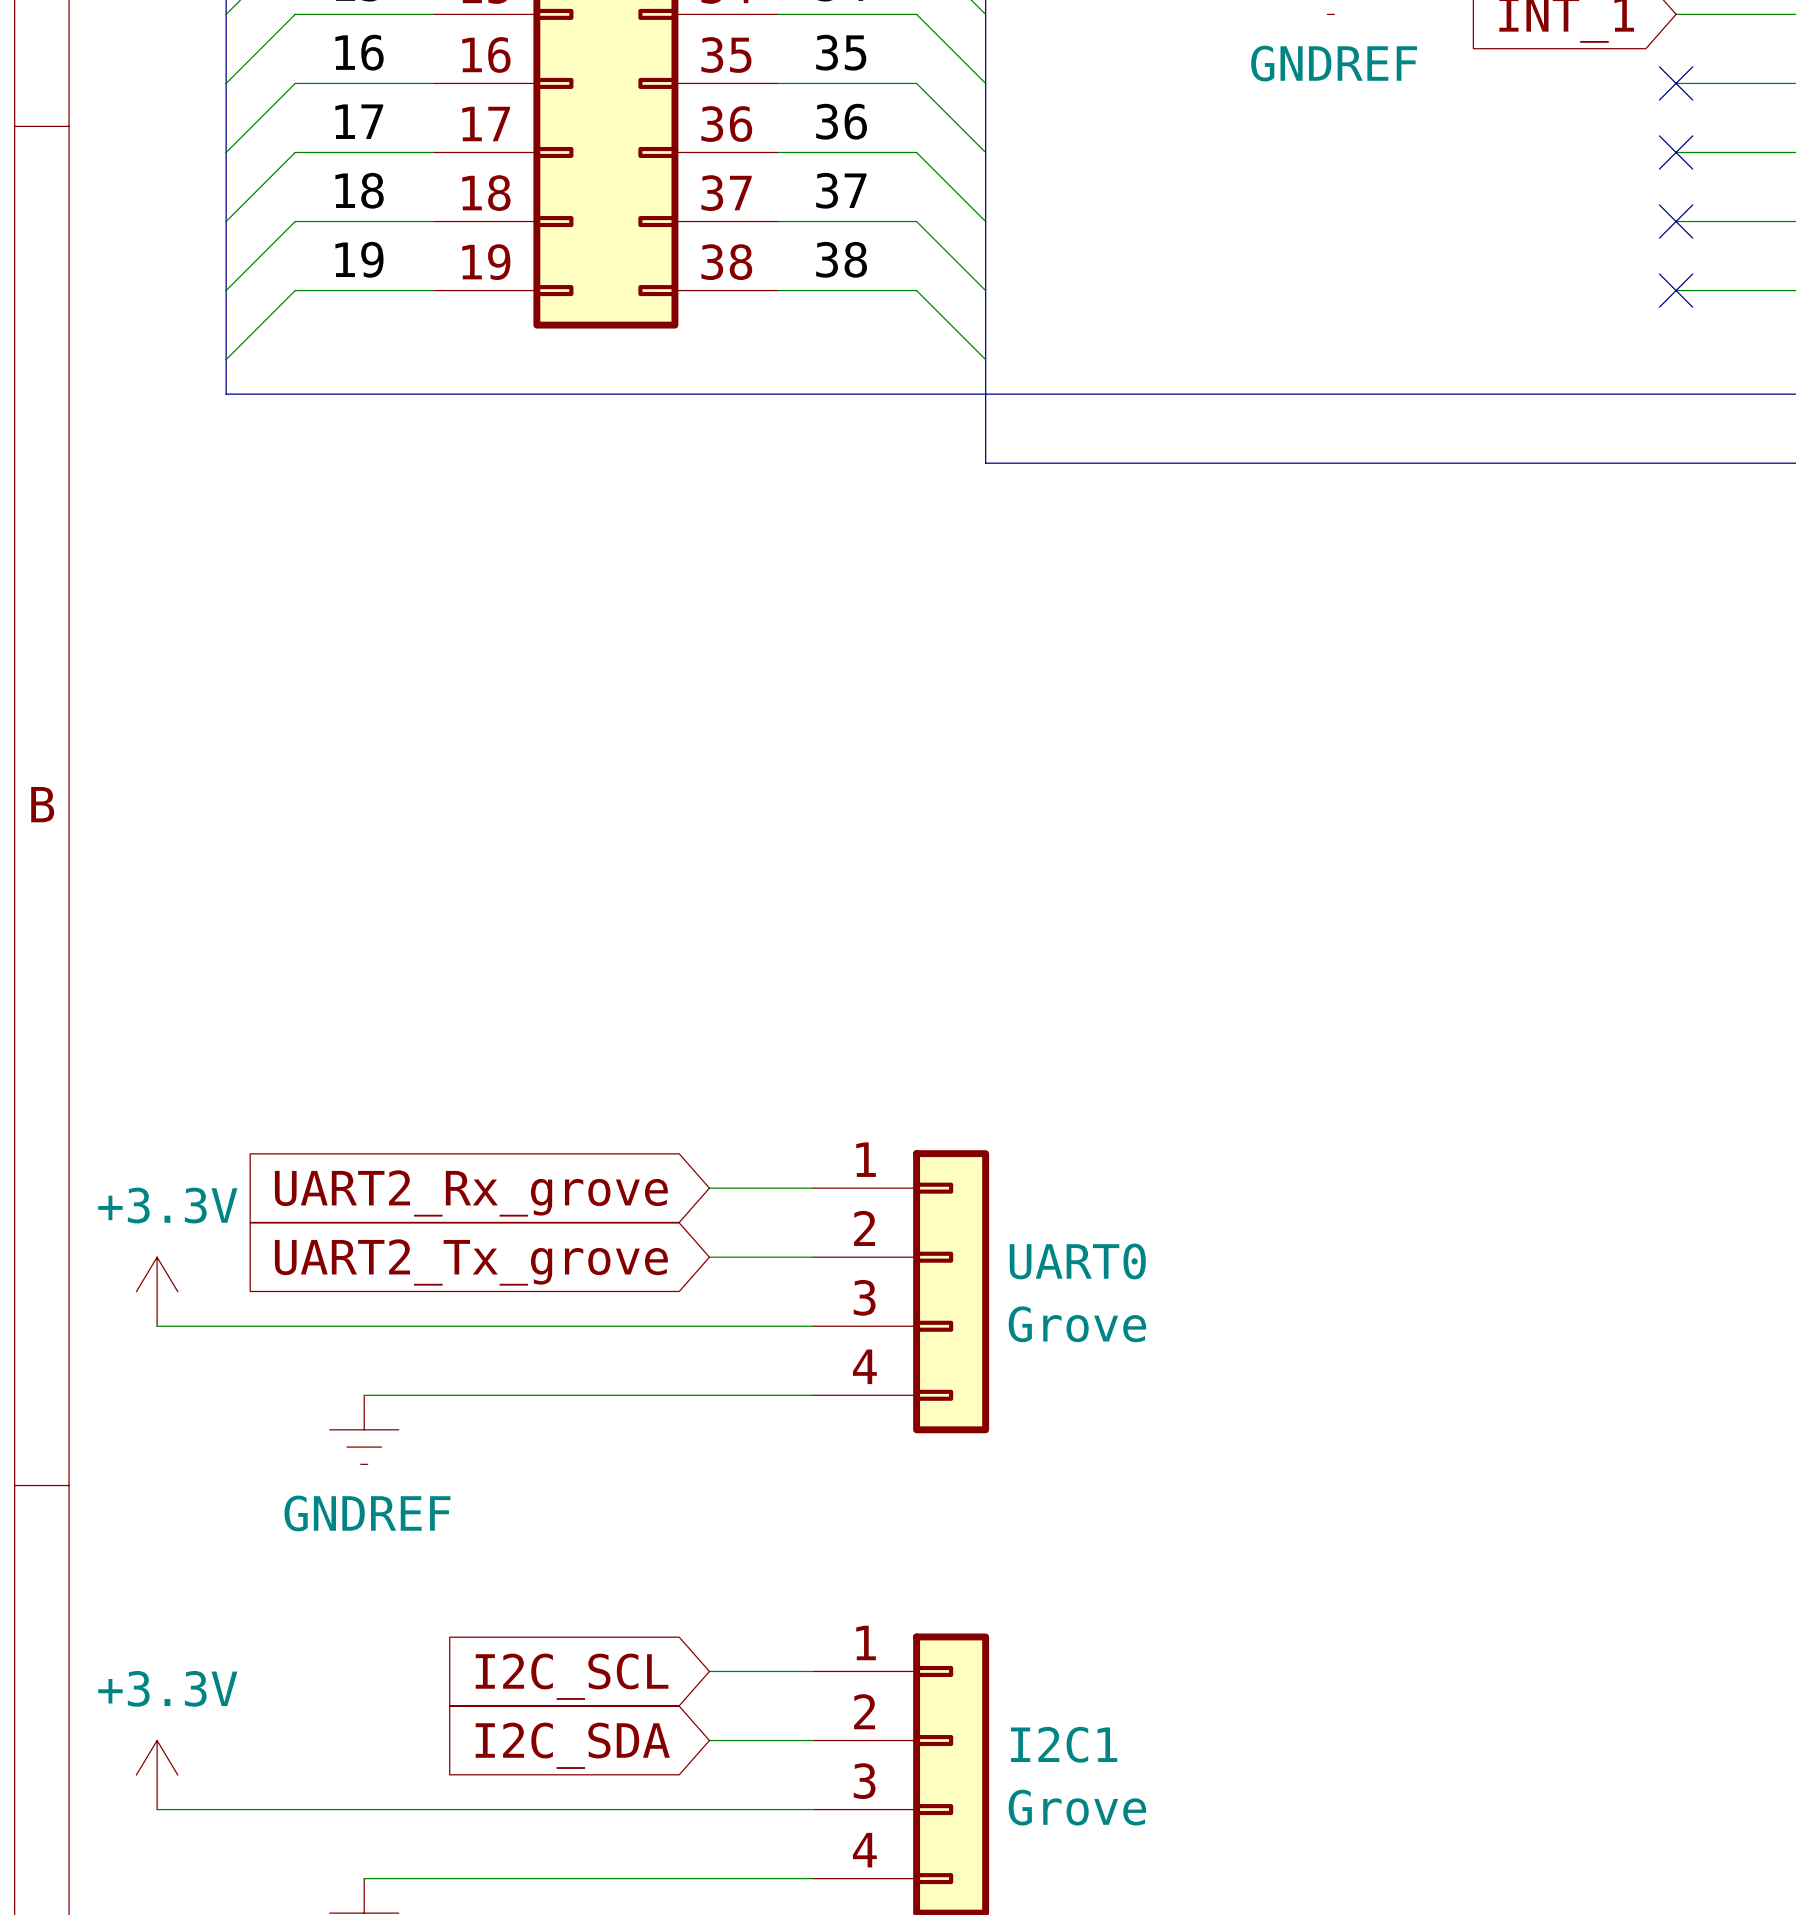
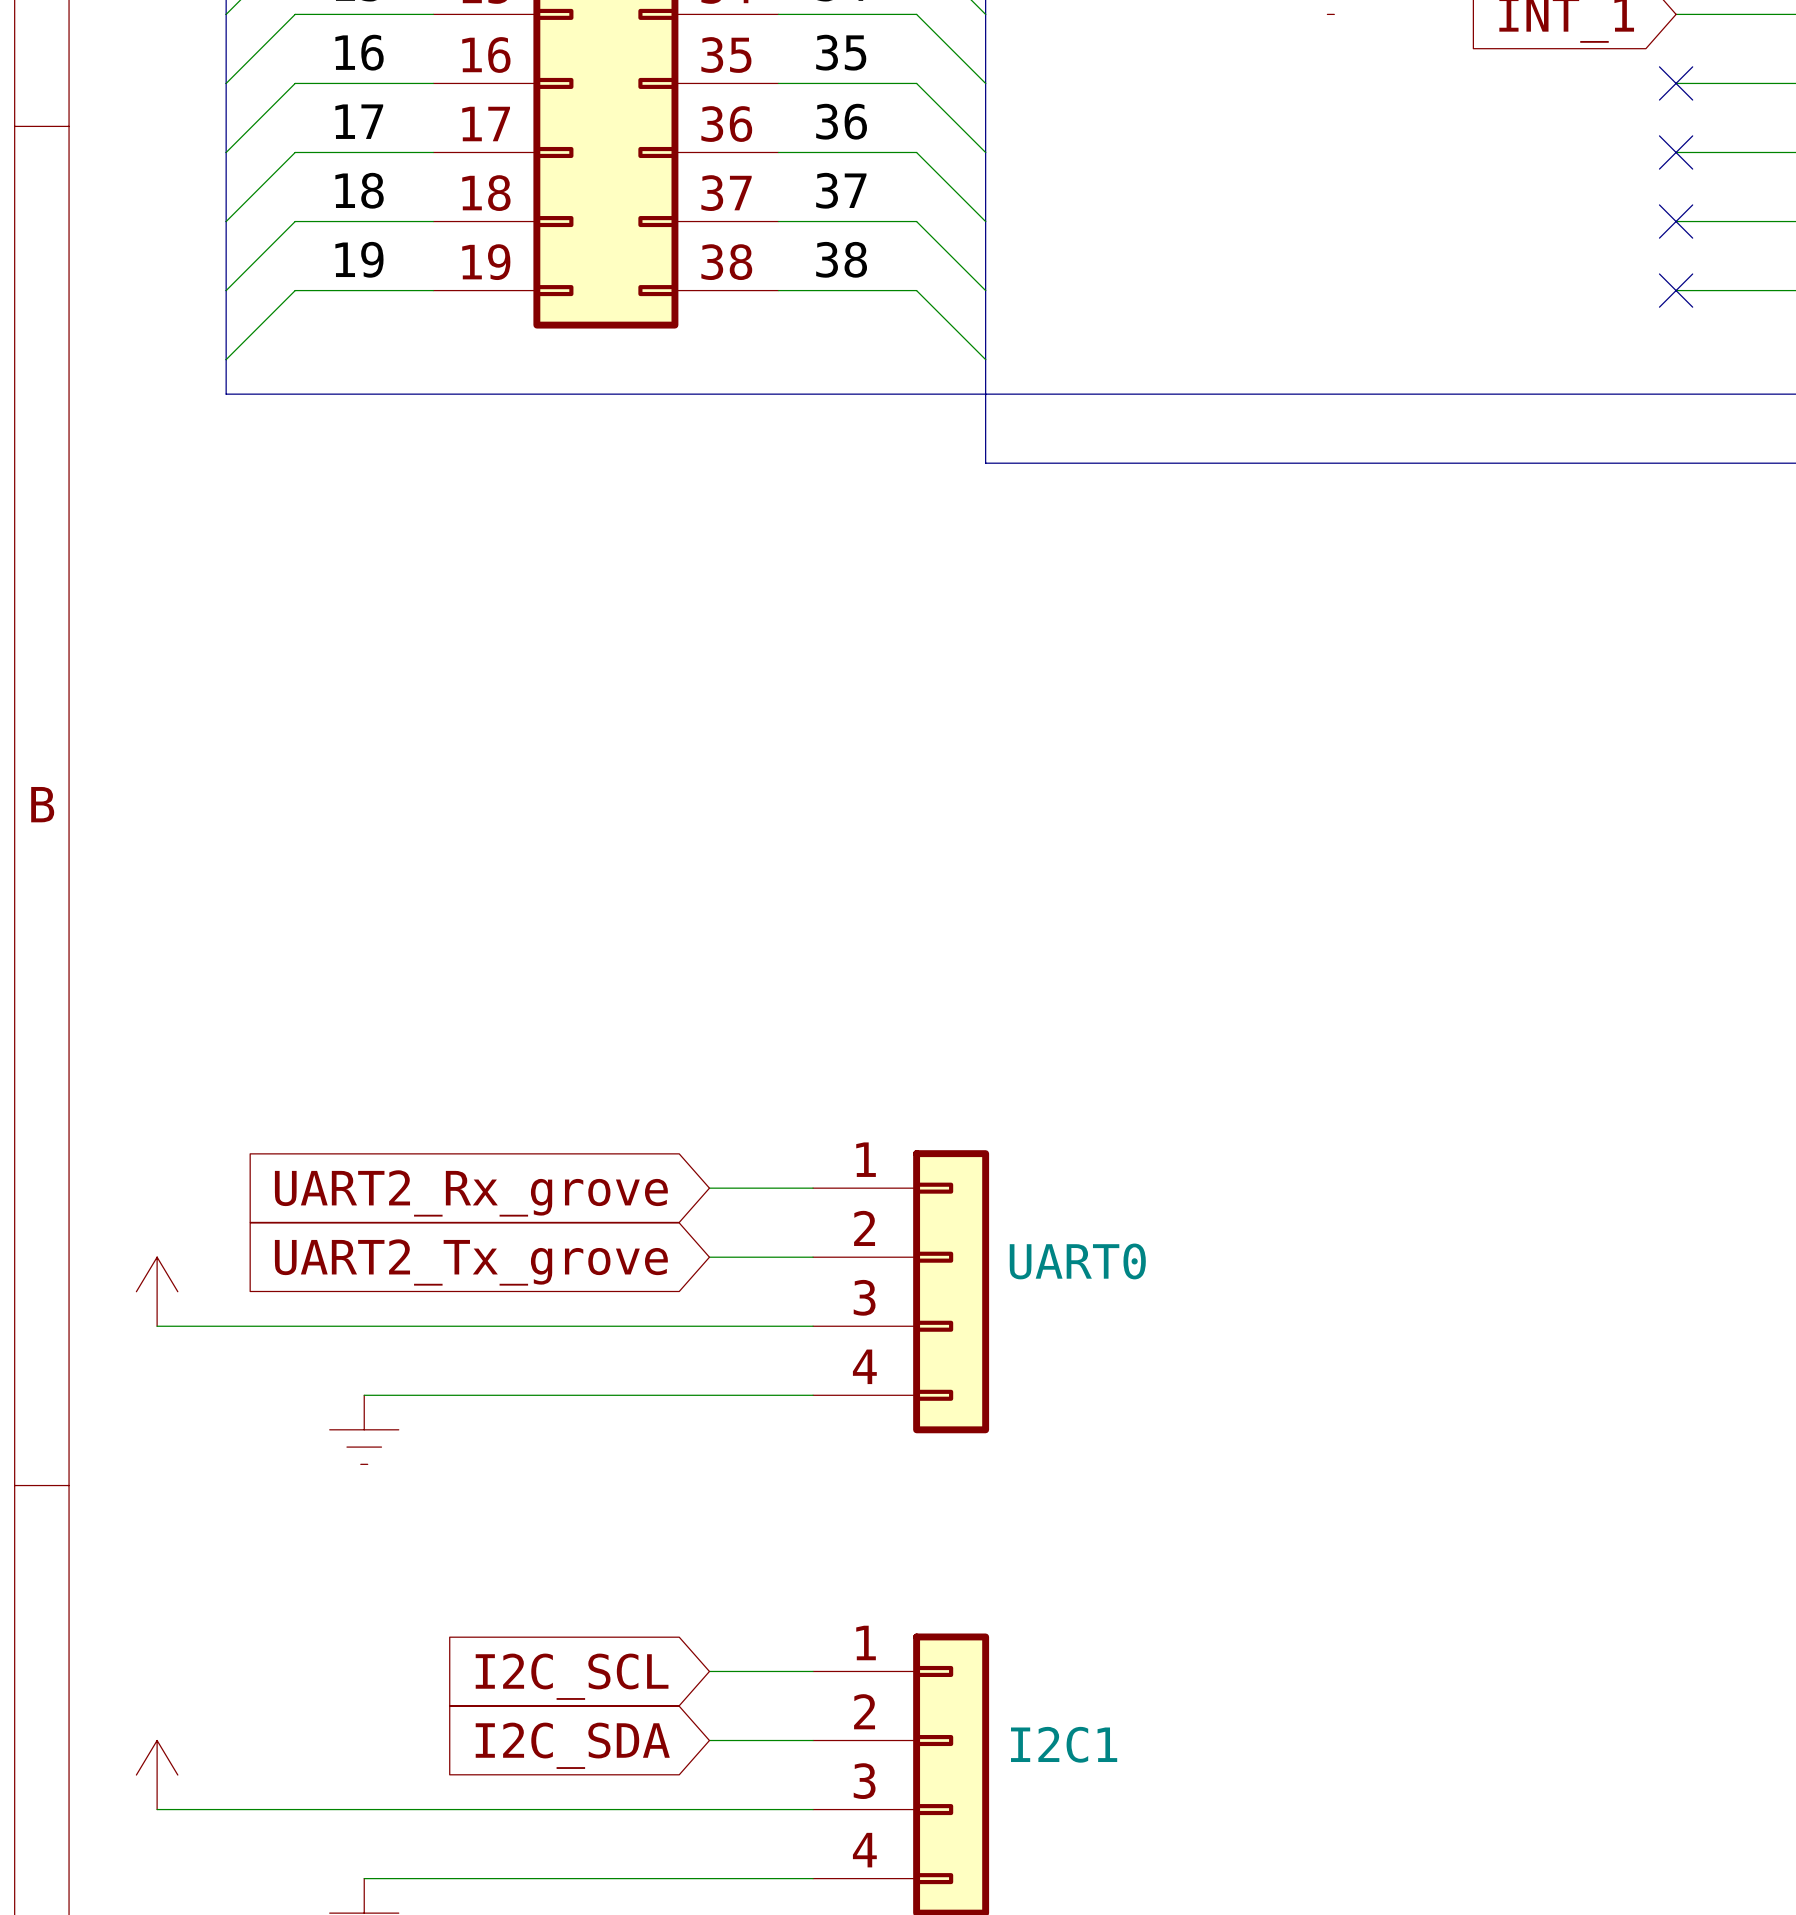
power symbol text: GNDREF (1334, 63) -> none
power symbol text: +3.3V (167, 1205) -> none
UART0 value: Grove (1077, 1324) -> none
power symbol text: GNDREF (367, 1513) -> none
power symbol text: +3.3V (167, 1688) -> none
I2C1 value: Grove (1077, 1807) -> none

